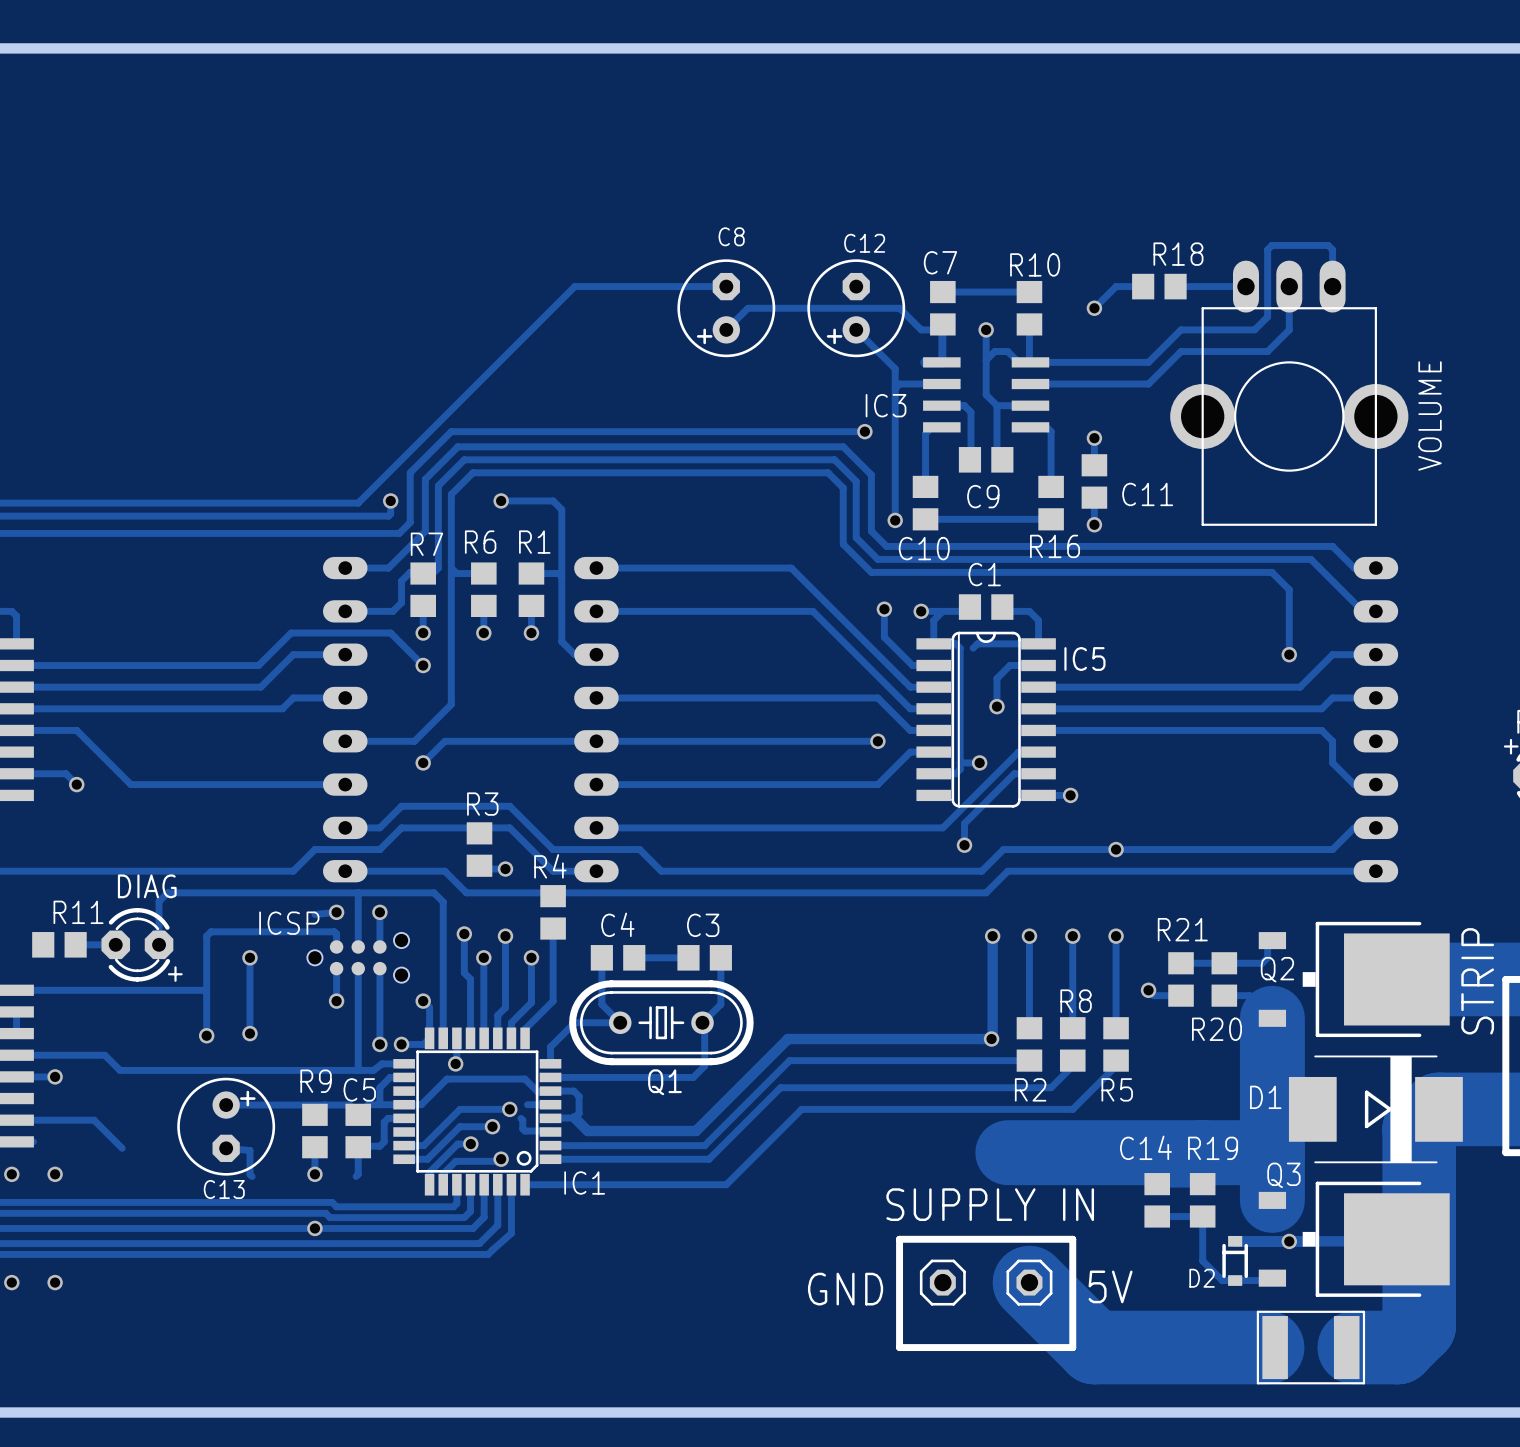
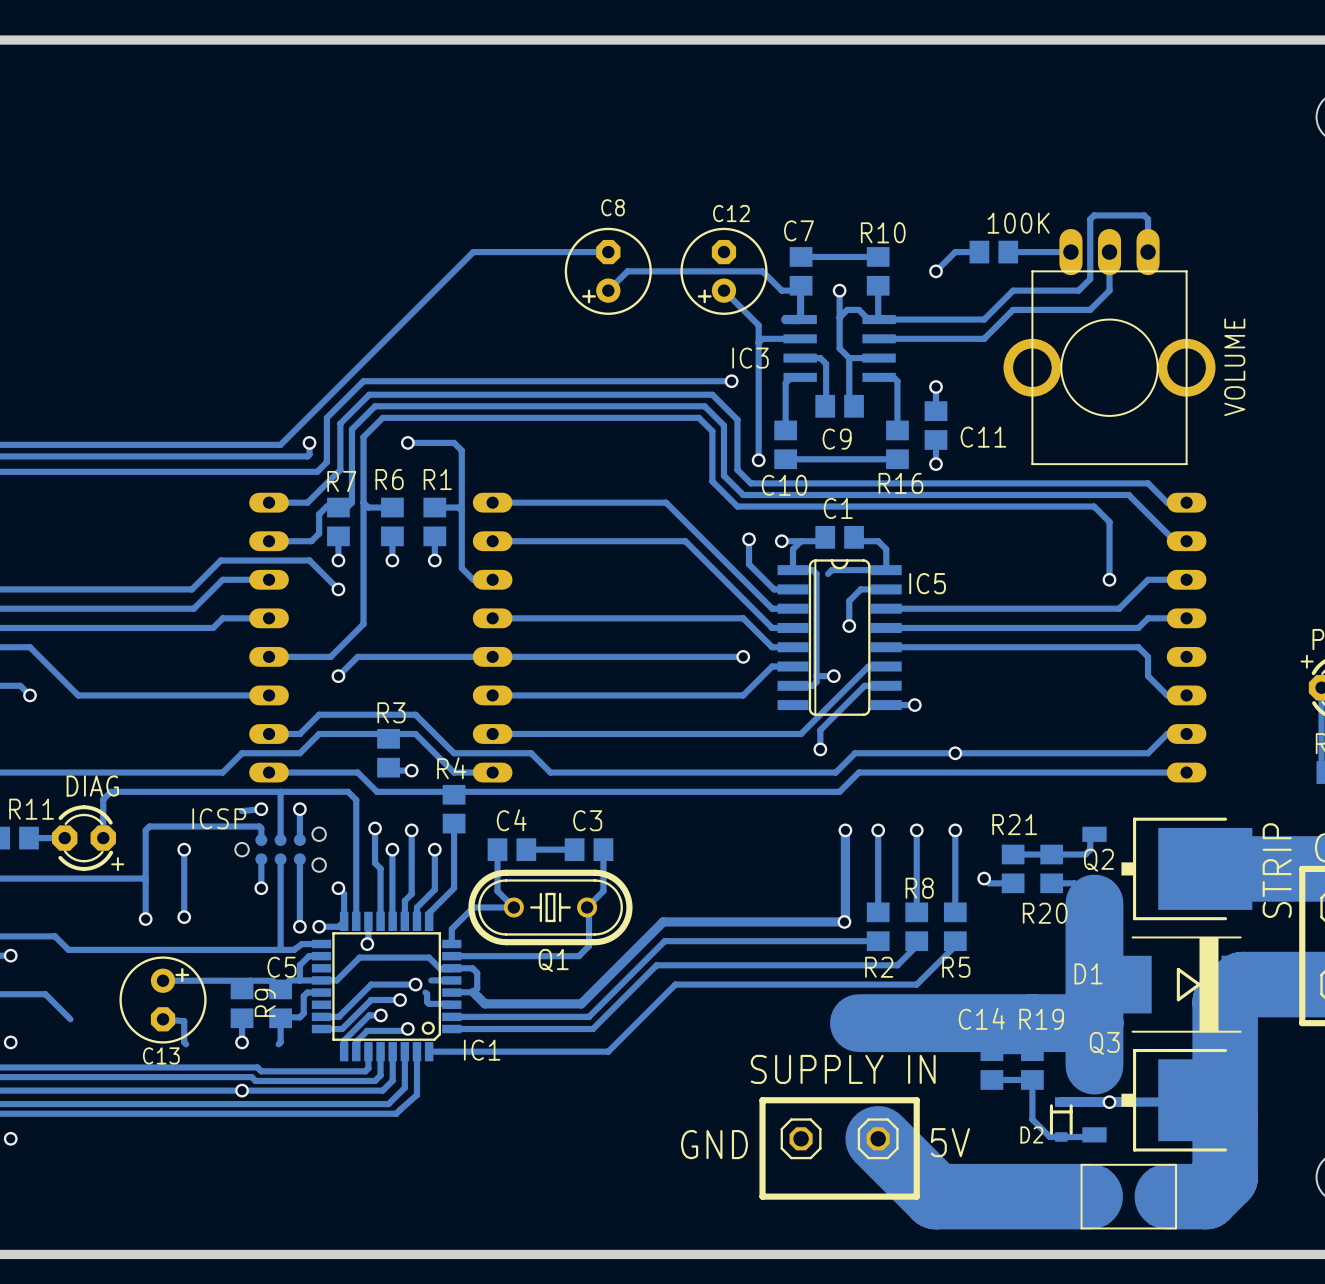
R18 name: R18 (1178, 254) -> 100K (1018, 223)
R9 name rotation: 0° (316, 1081) -> 90° counterclockwise (265, 1002)
R9 name position: R9 (316, 1081) -> R9 (265, 1002)

